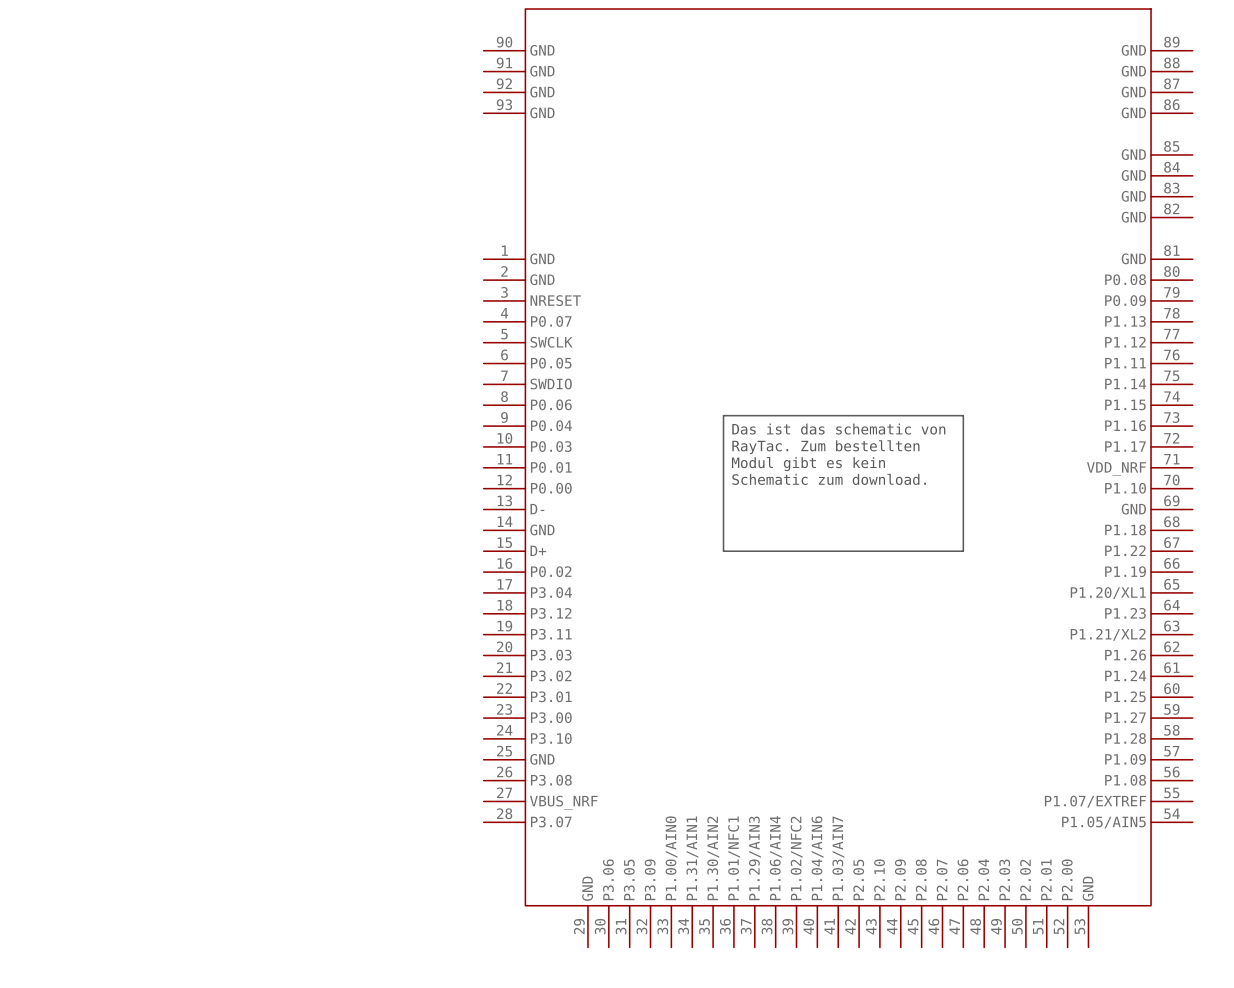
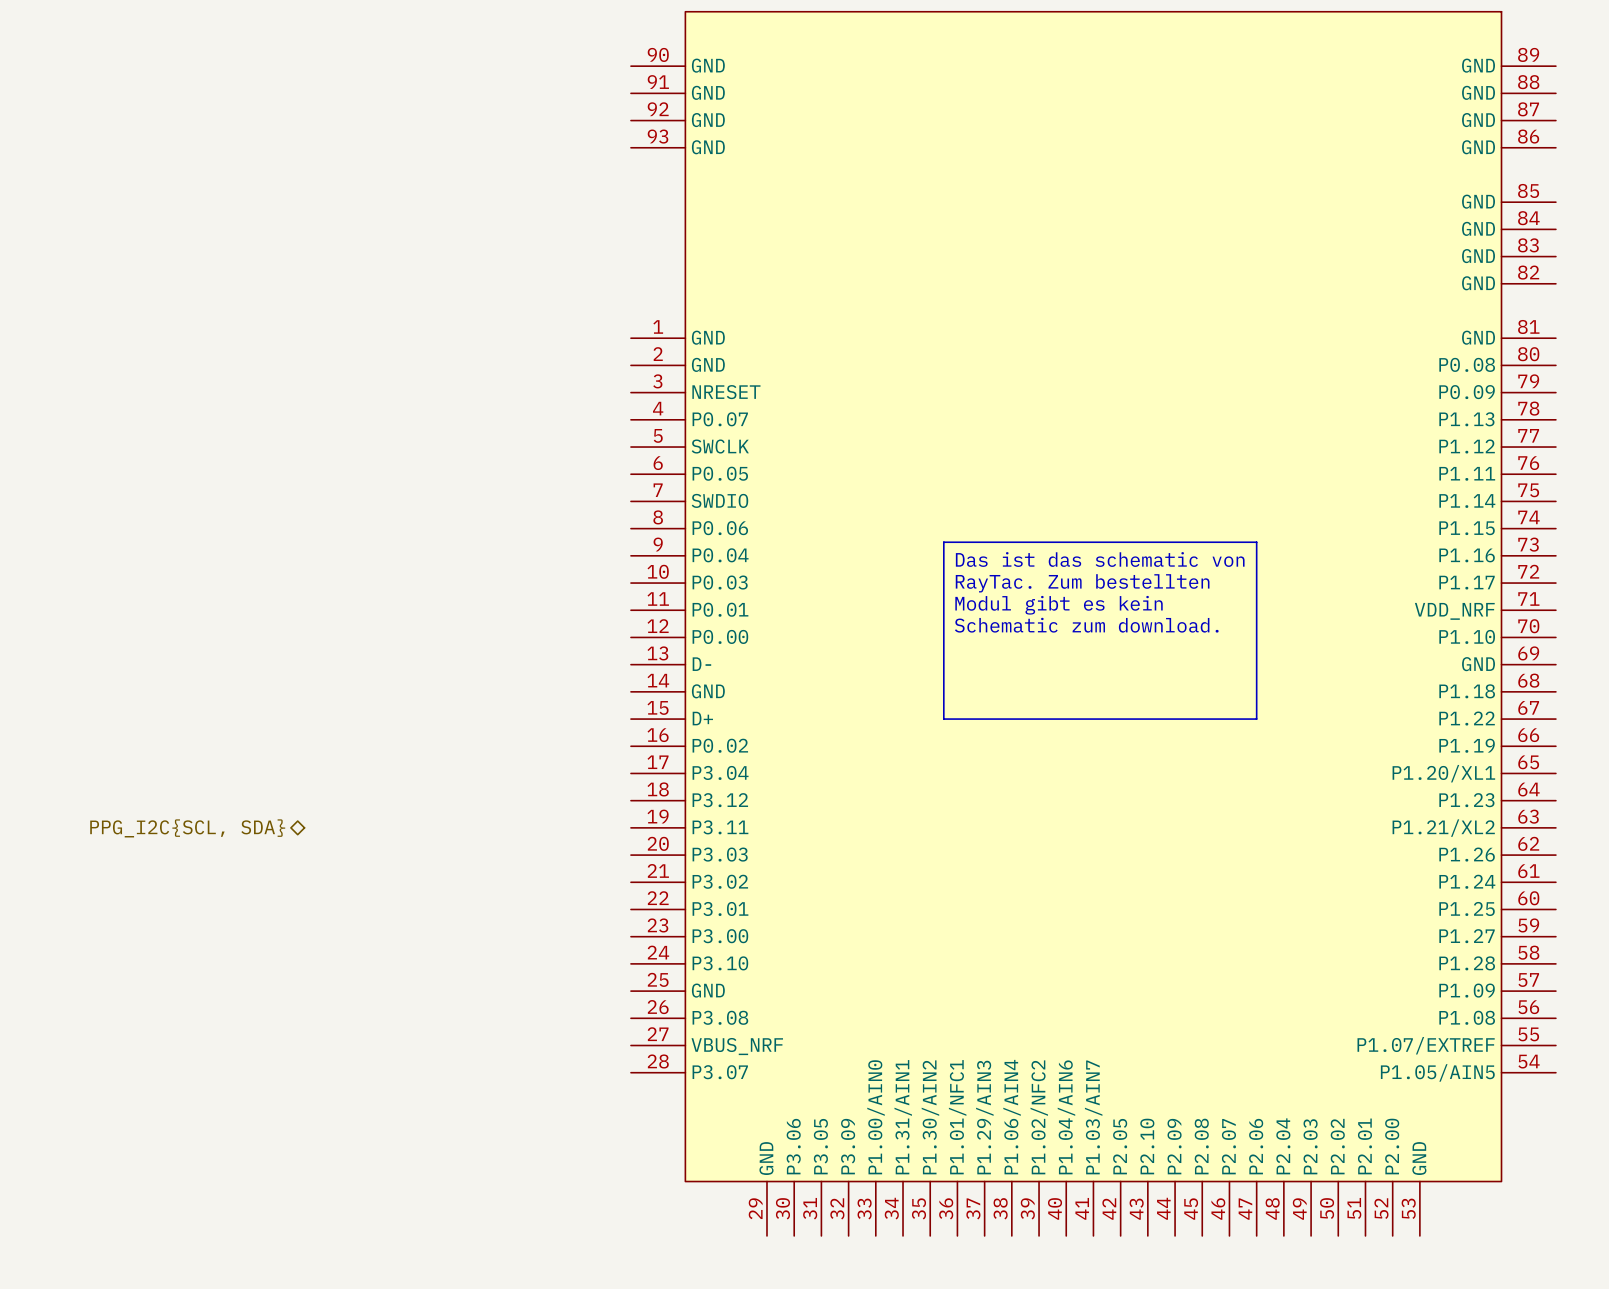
hierarchical label: none -> PPG_I2C{SCL, SDA} (187, 828)

